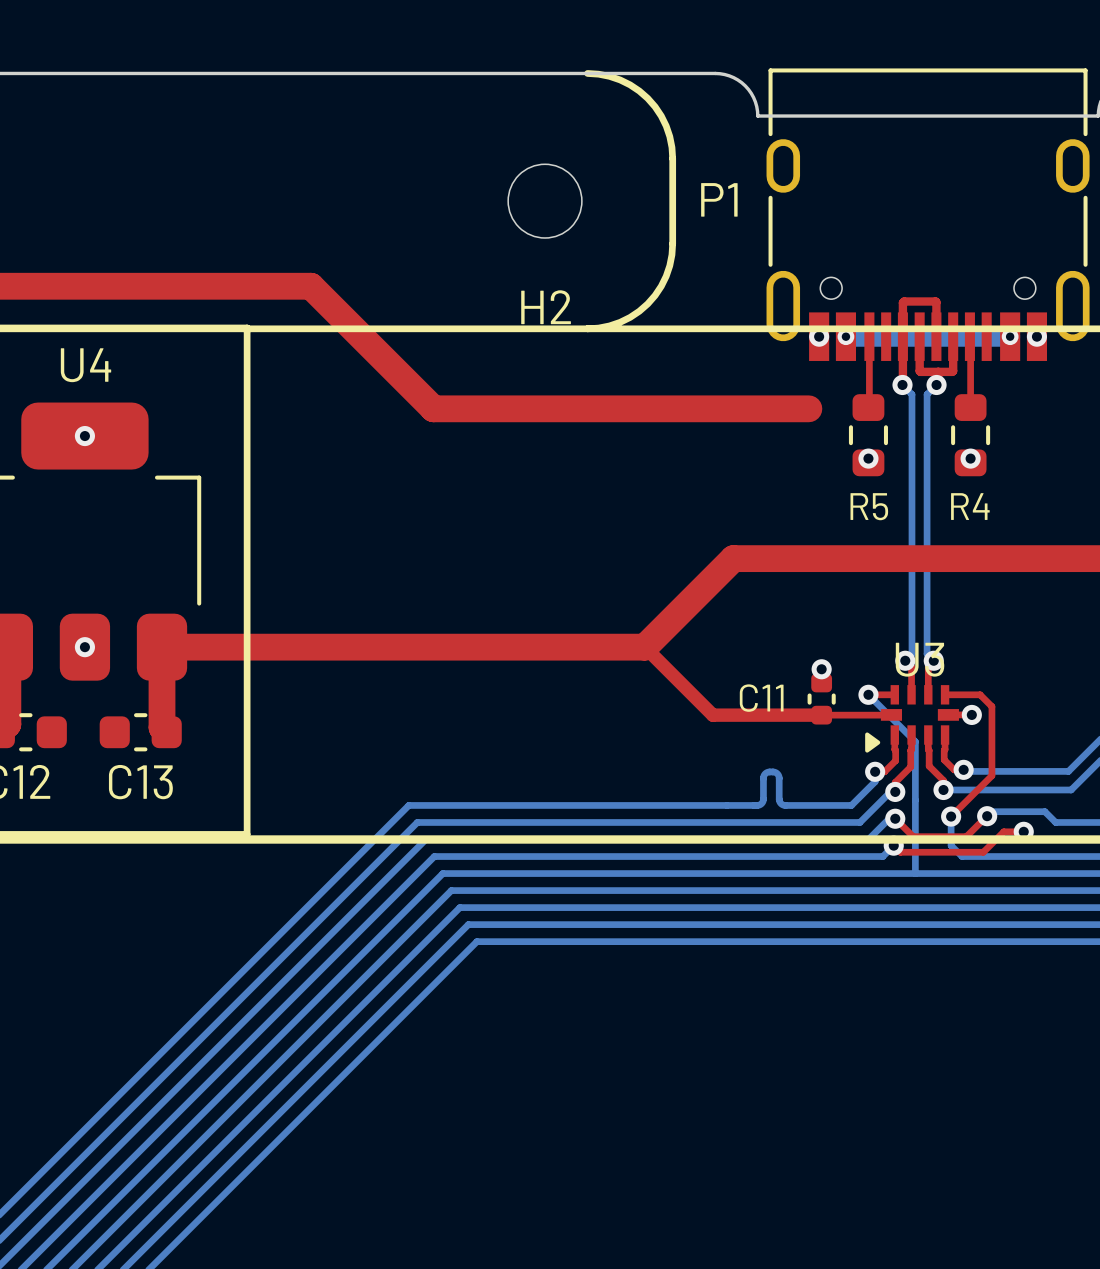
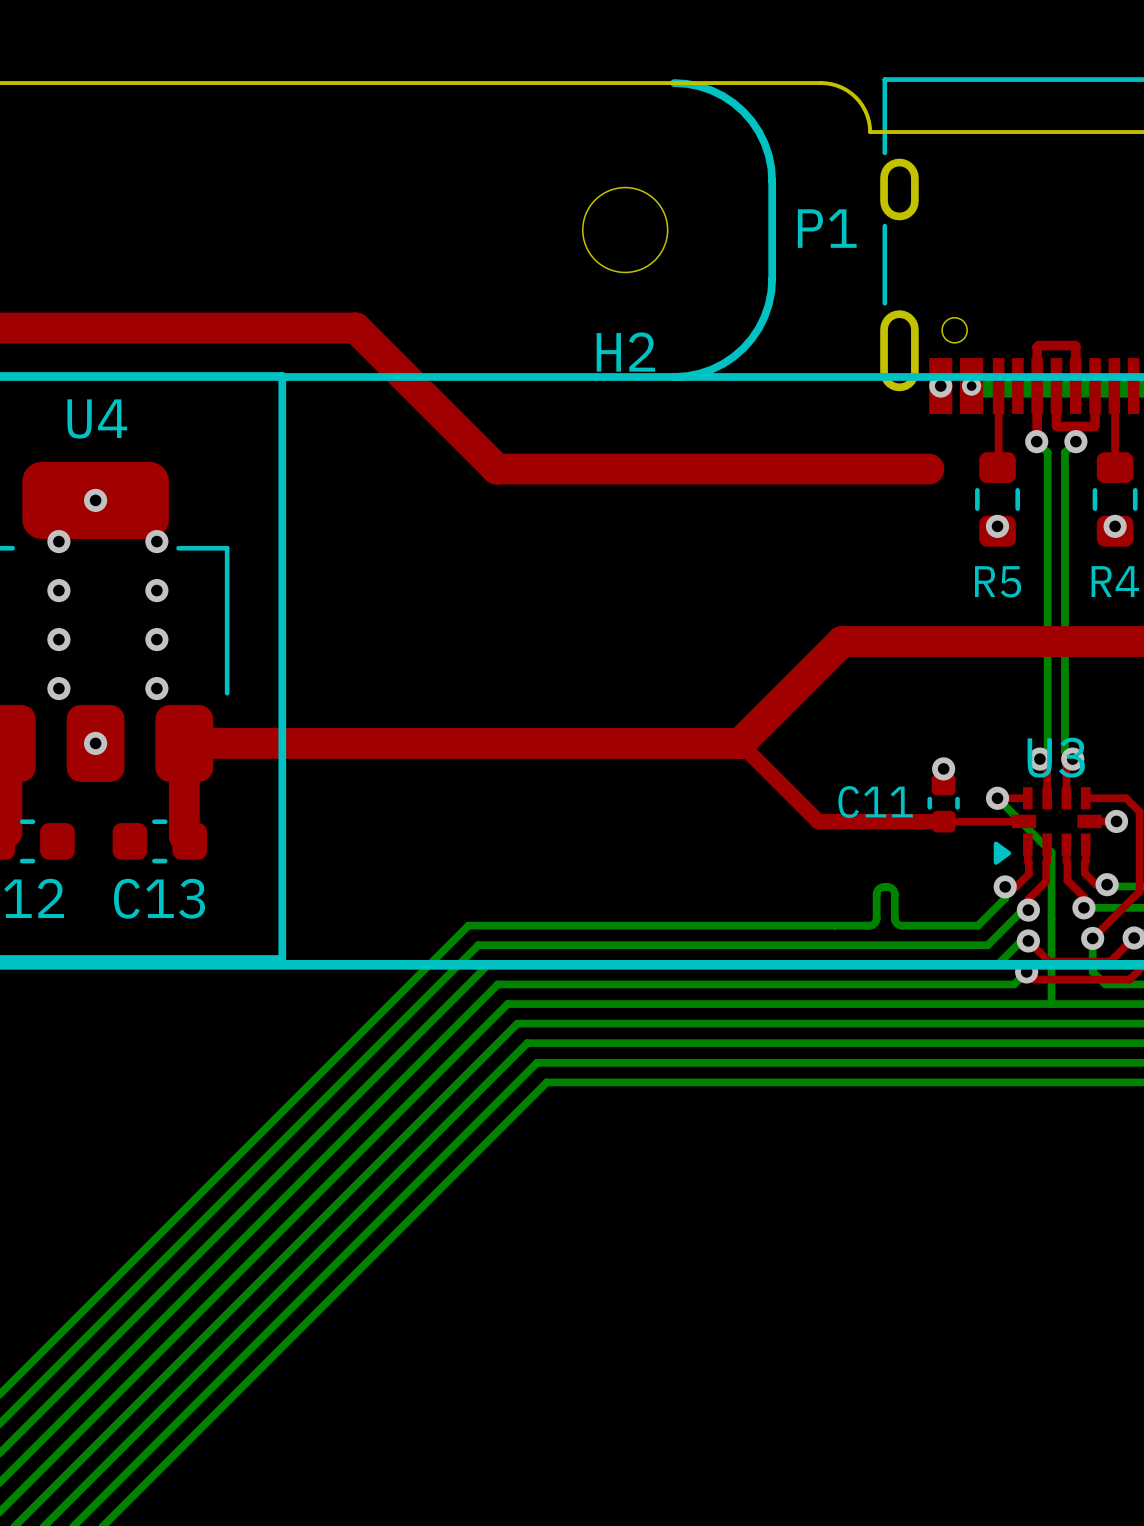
via: none -> (58, 541)
via: none -> (156, 541)
via: none -> (58, 590)
via: none -> (156, 590)
via: none -> (58, 639)
via: none -> (156, 639)
via: none -> (58, 688)
via: none -> (156, 688)

